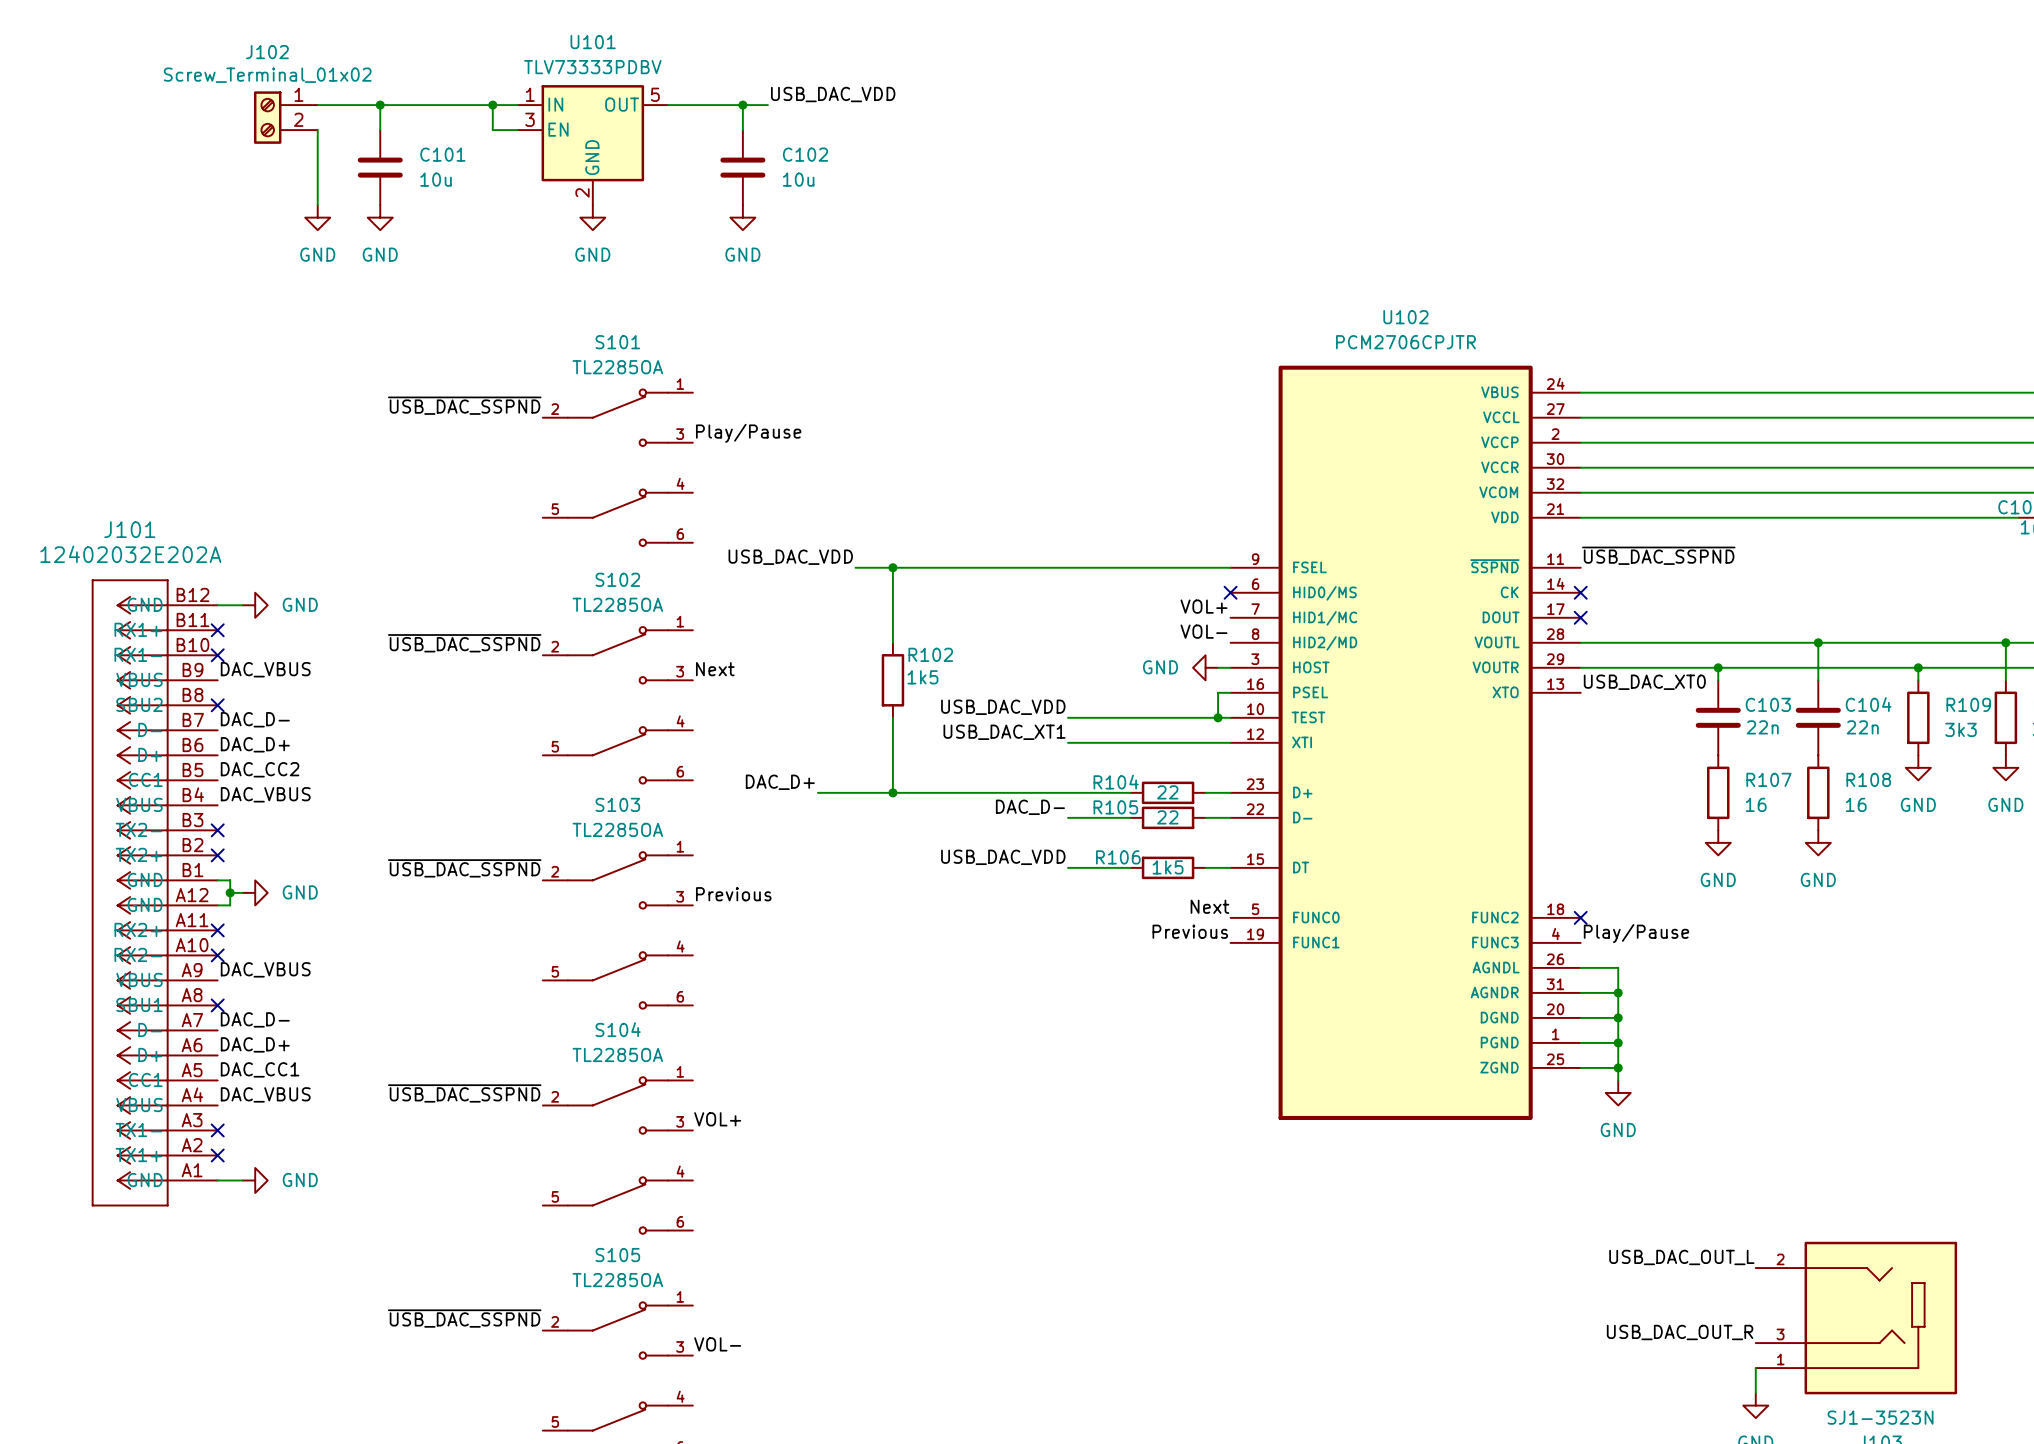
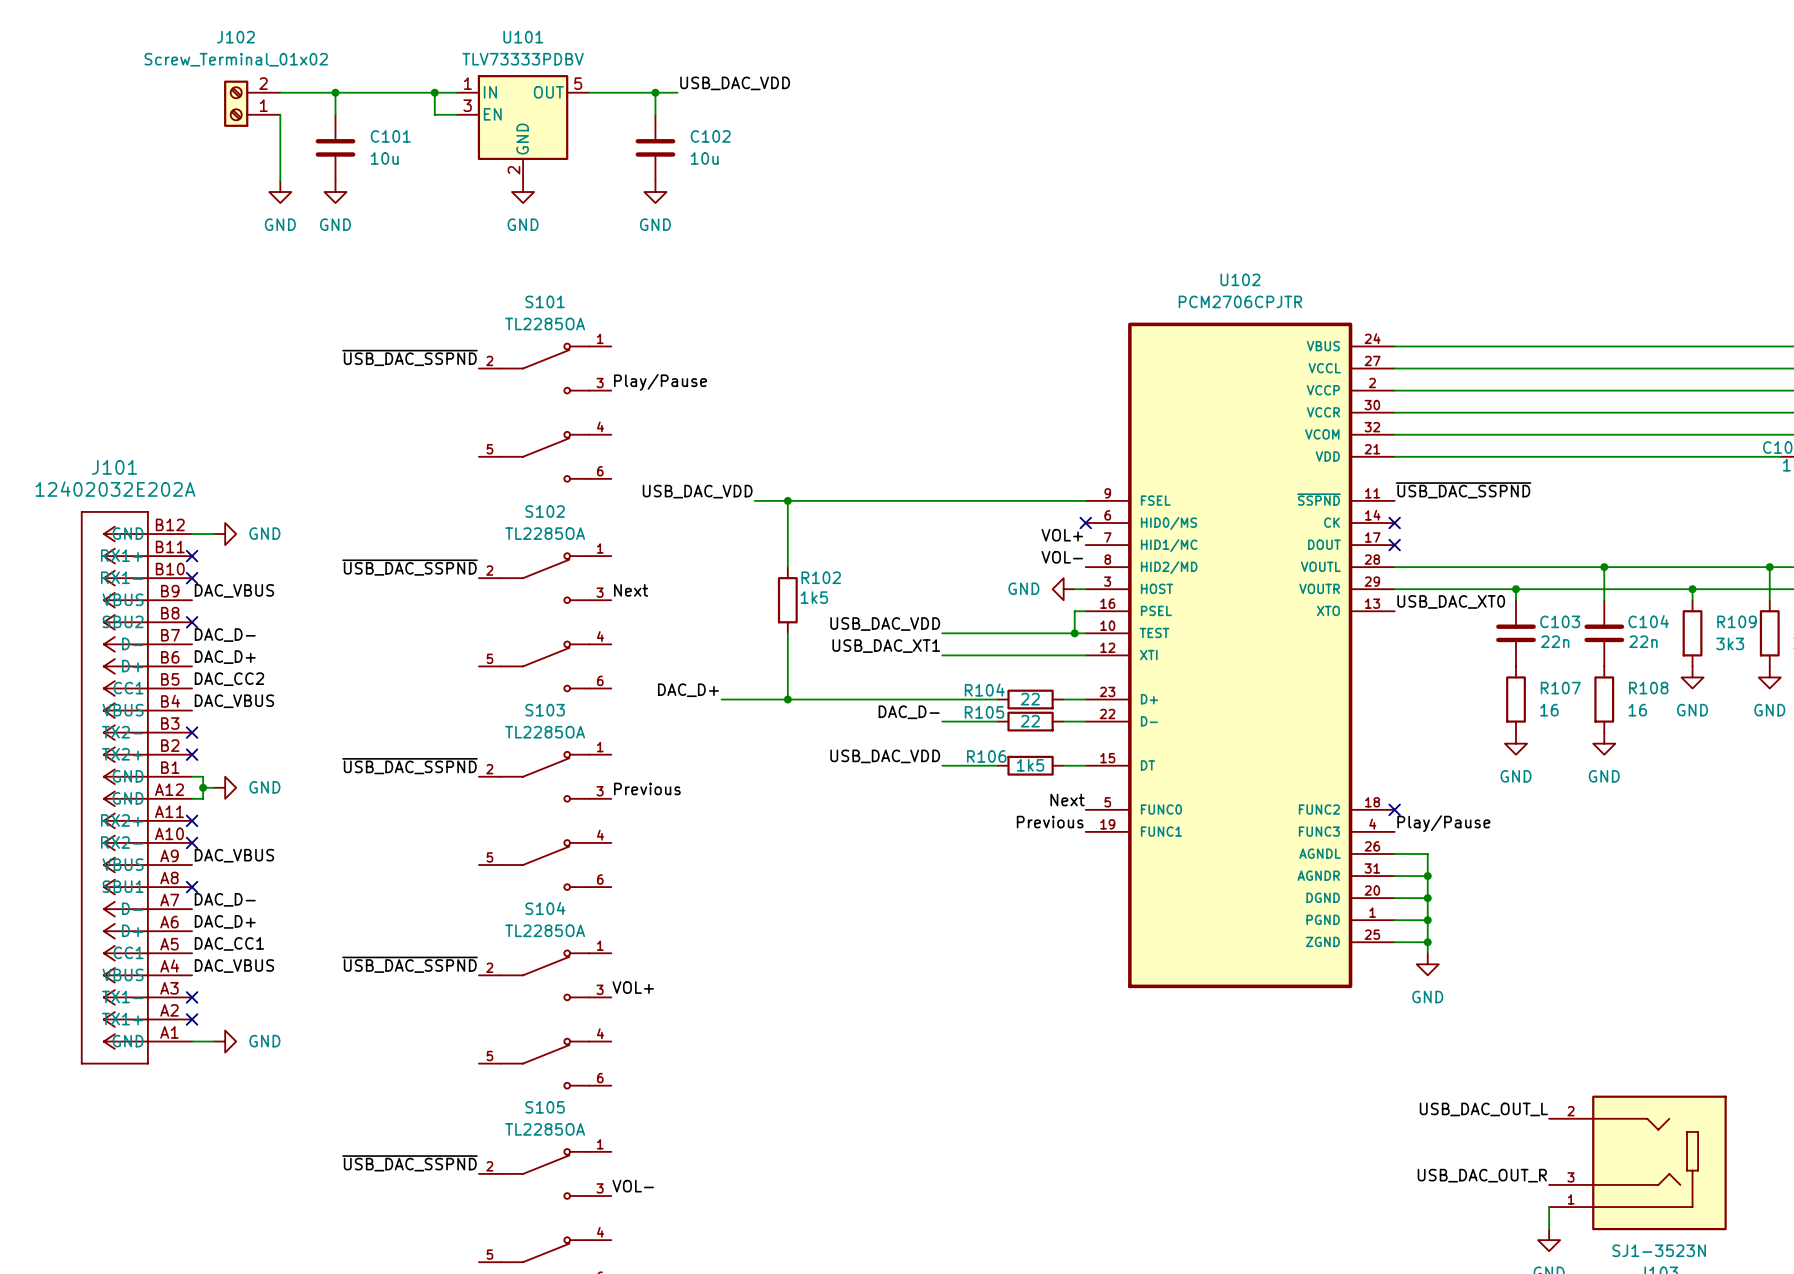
J102 flip: as is (267, 117) -> up-down (236, 103)

